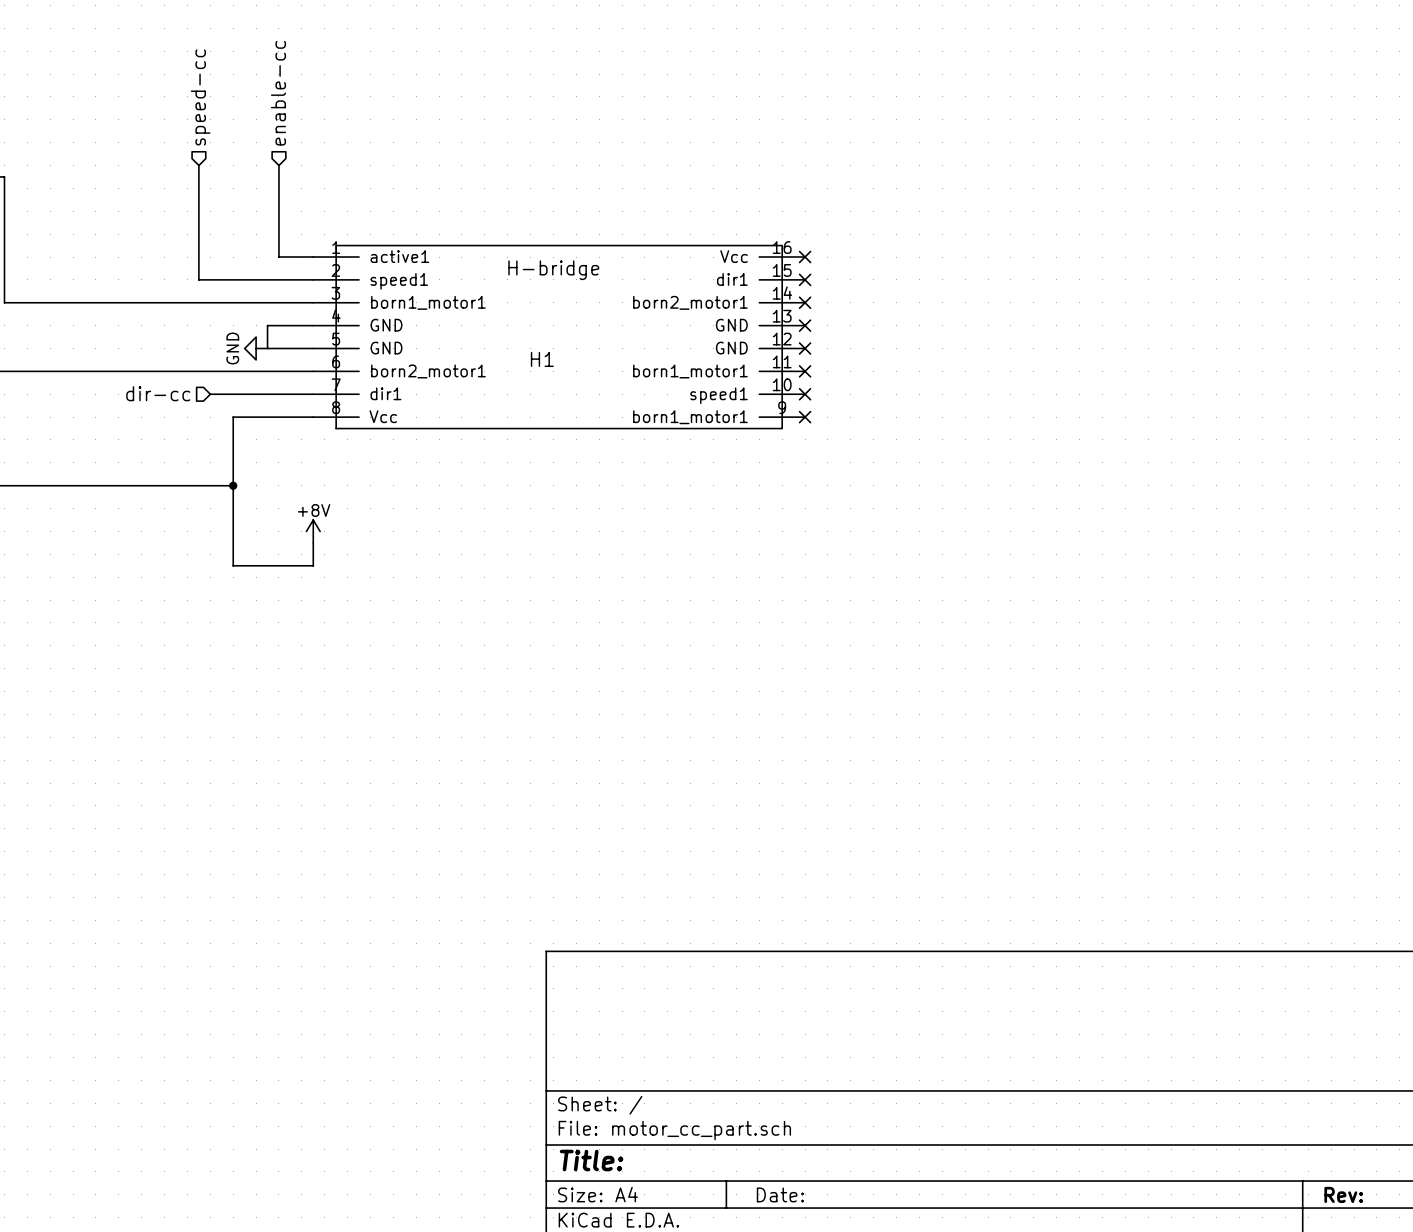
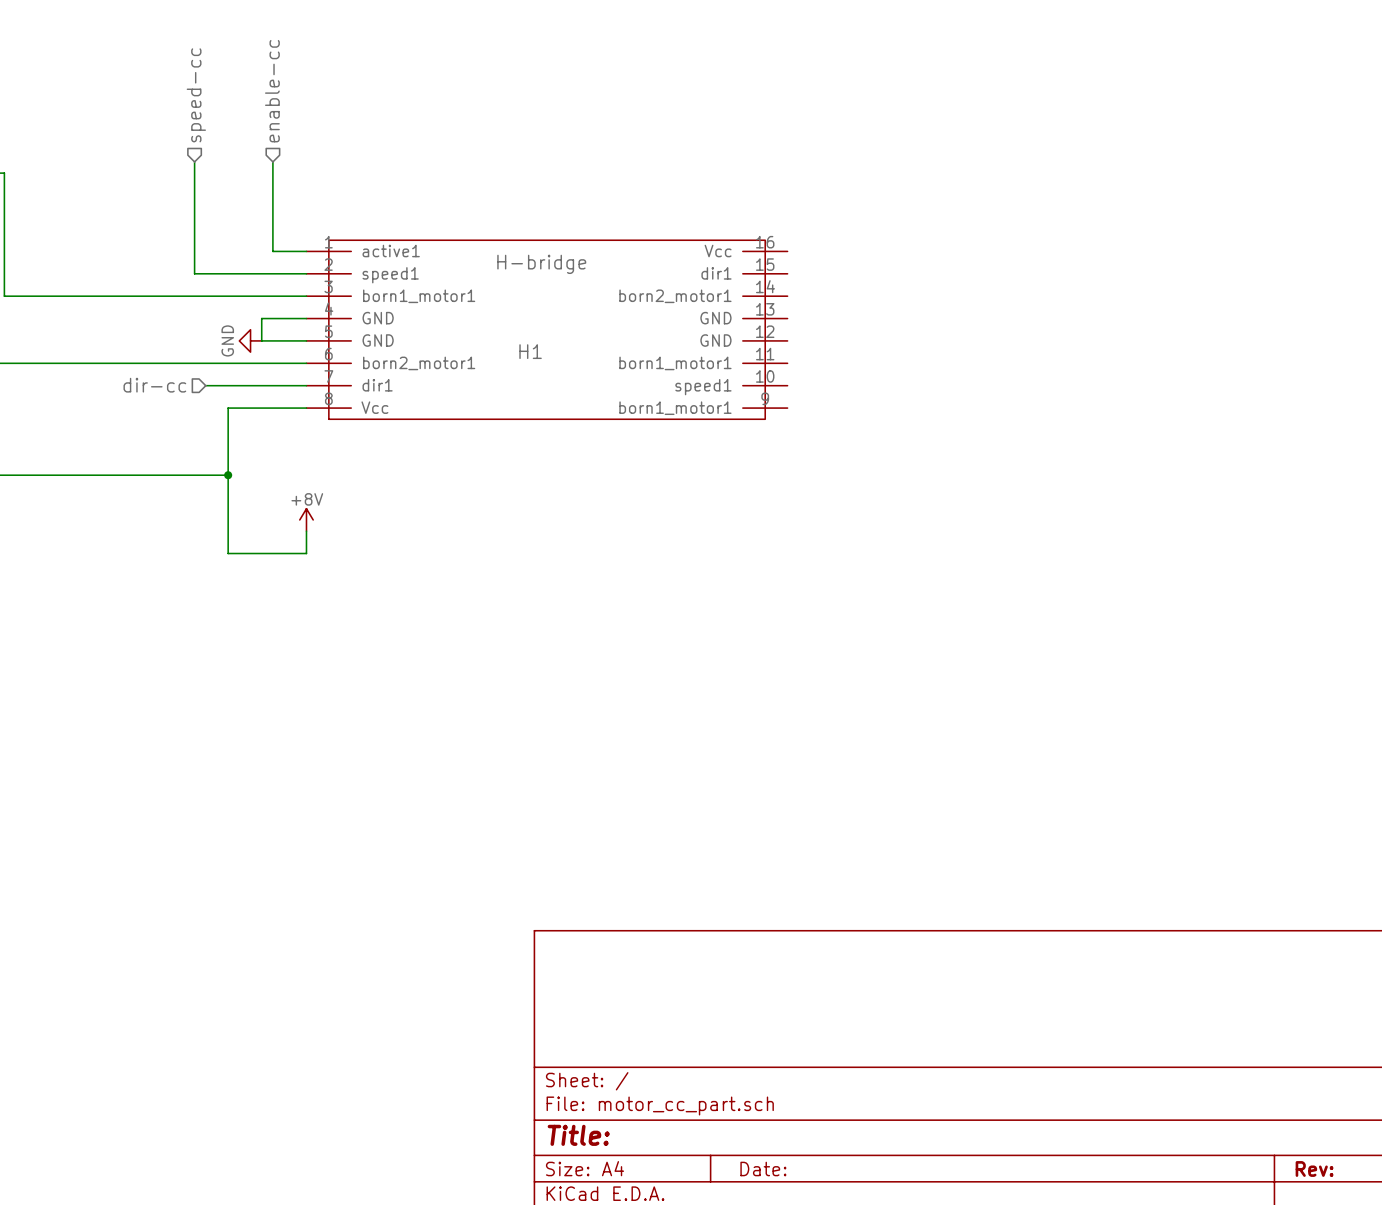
no-connect mark: (805, 257) -> none
no-connect mark: (805, 279) -> none
no-connect mark: (805, 302) -> none
no-connect mark: (805, 325) -> none
no-connect mark: (805, 348) -> none
no-connect mark: (805, 371) -> none
no-connect mark: (805, 394) -> none
no-connect mark: (805, 417) -> none

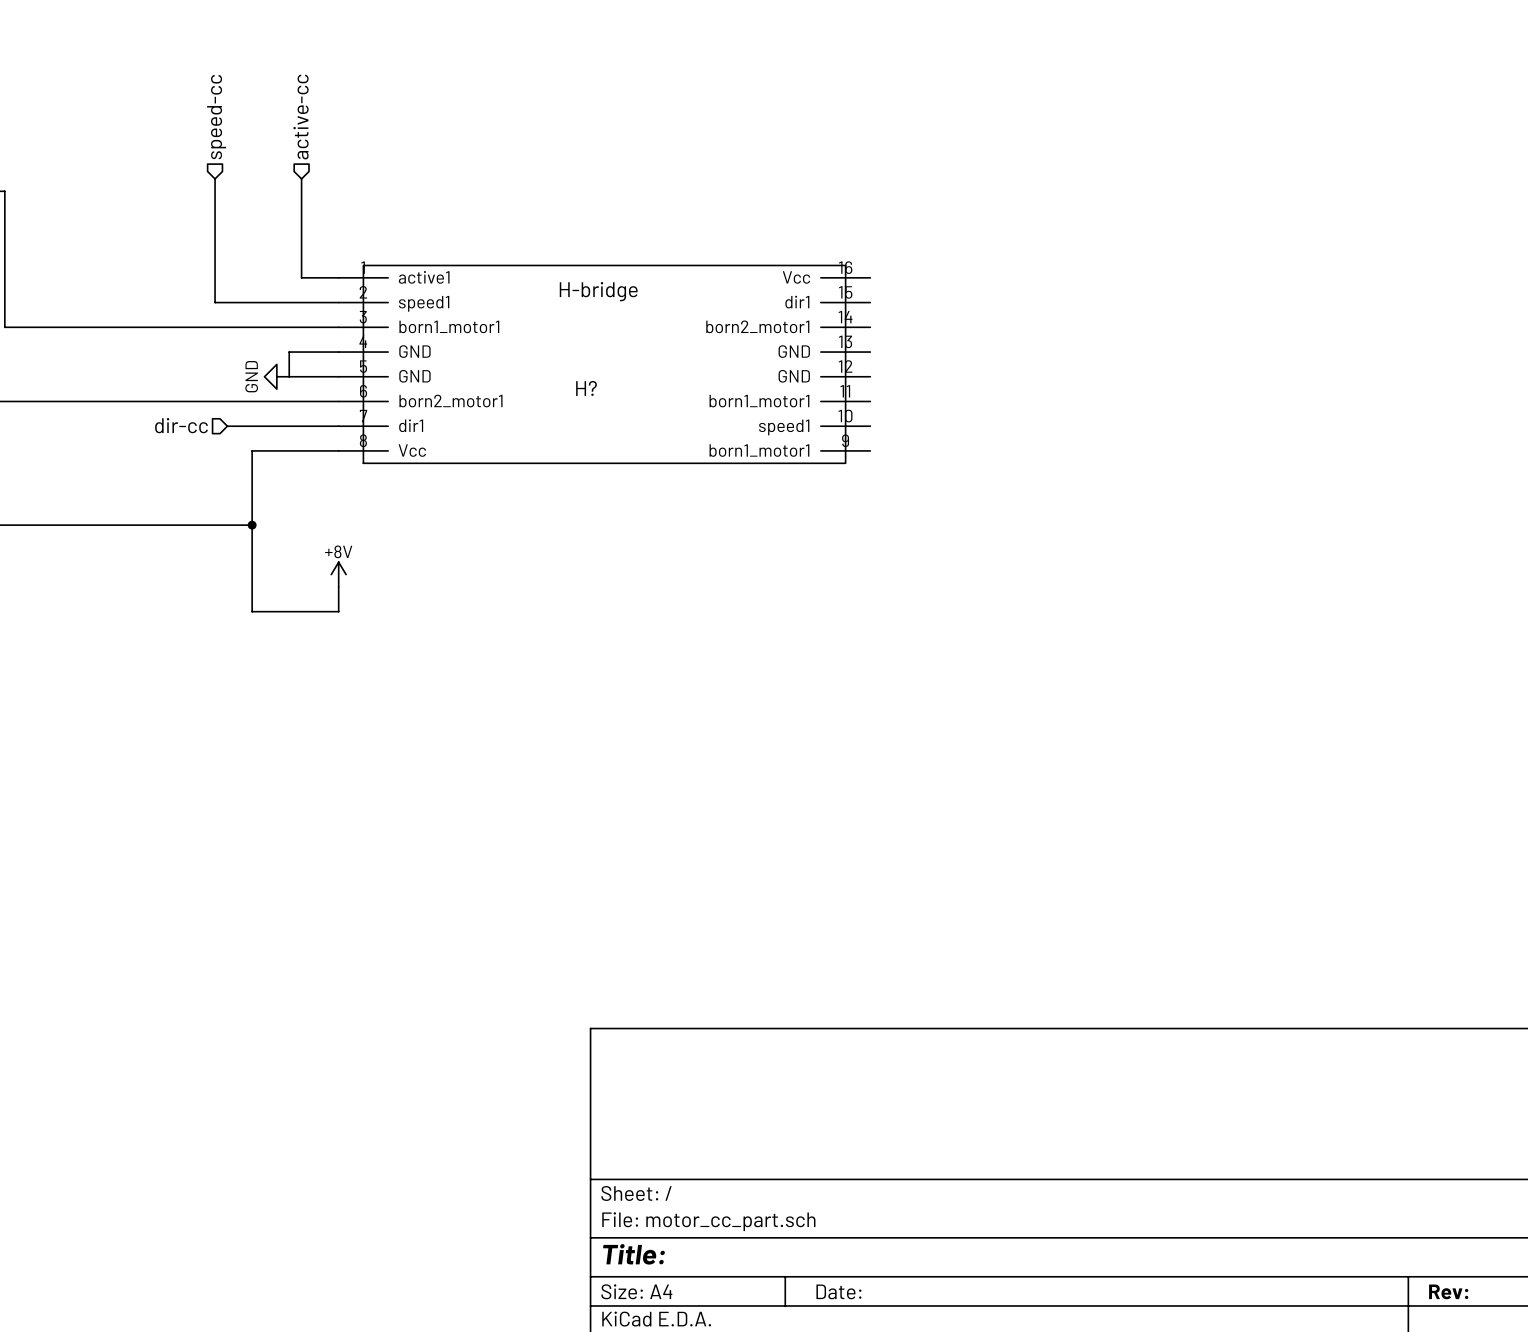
hierarchical label: enable-cc (272, 91) -> active-cc (301, 117)
H1 name: H1 (530, 351) -> H? (586, 388)

